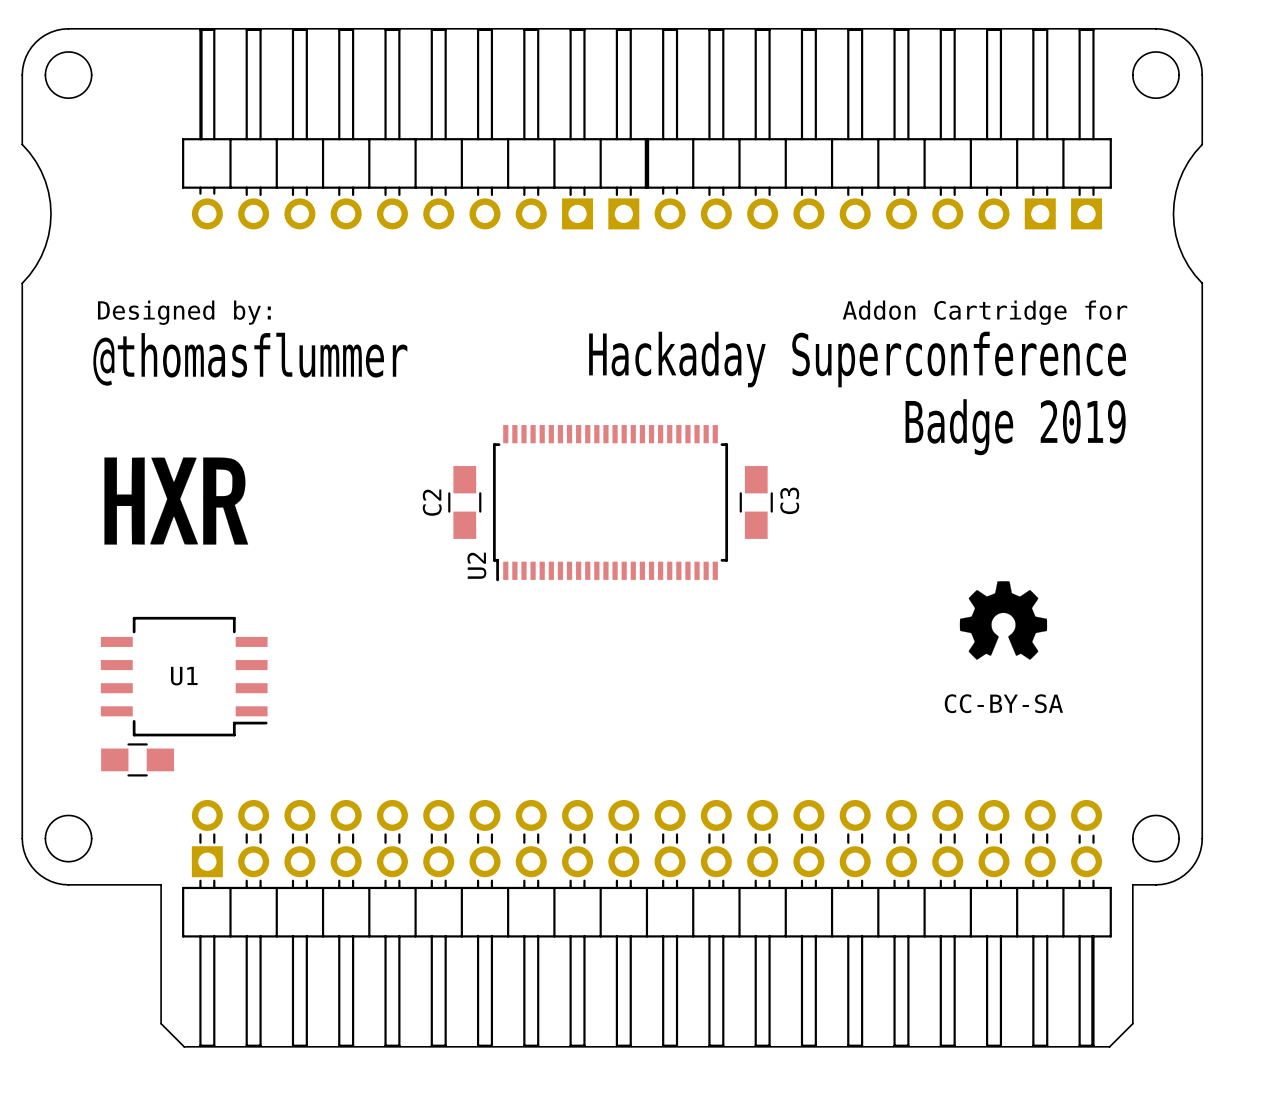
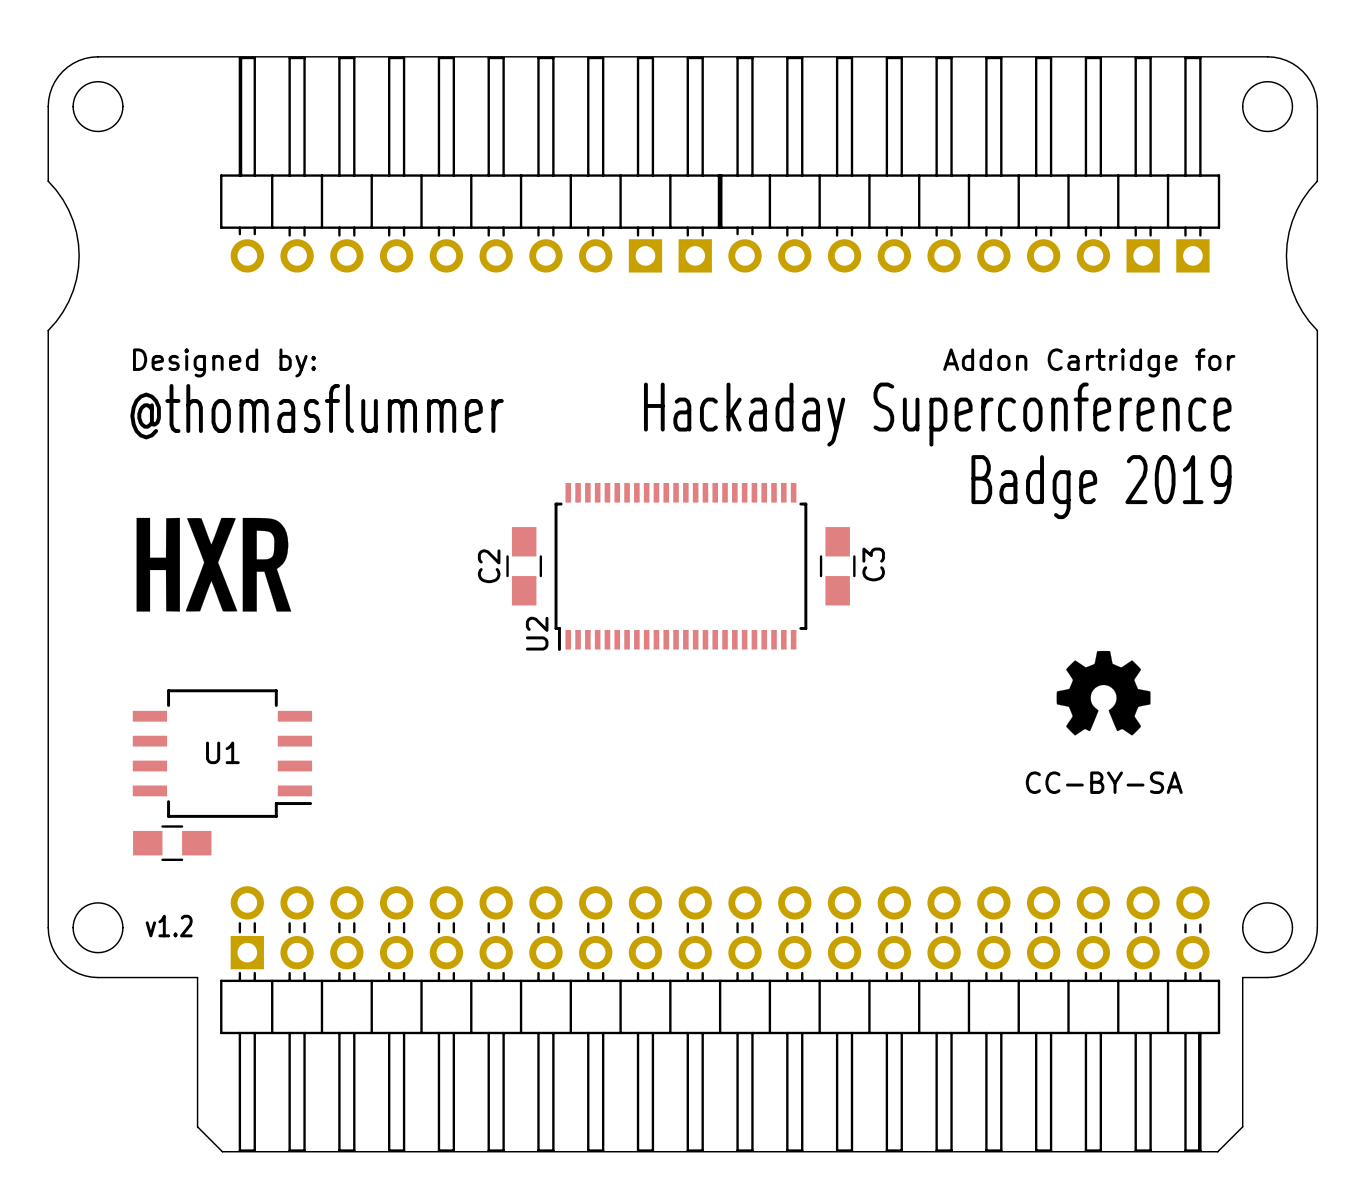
text: none -> v1.2 (169, 926)

